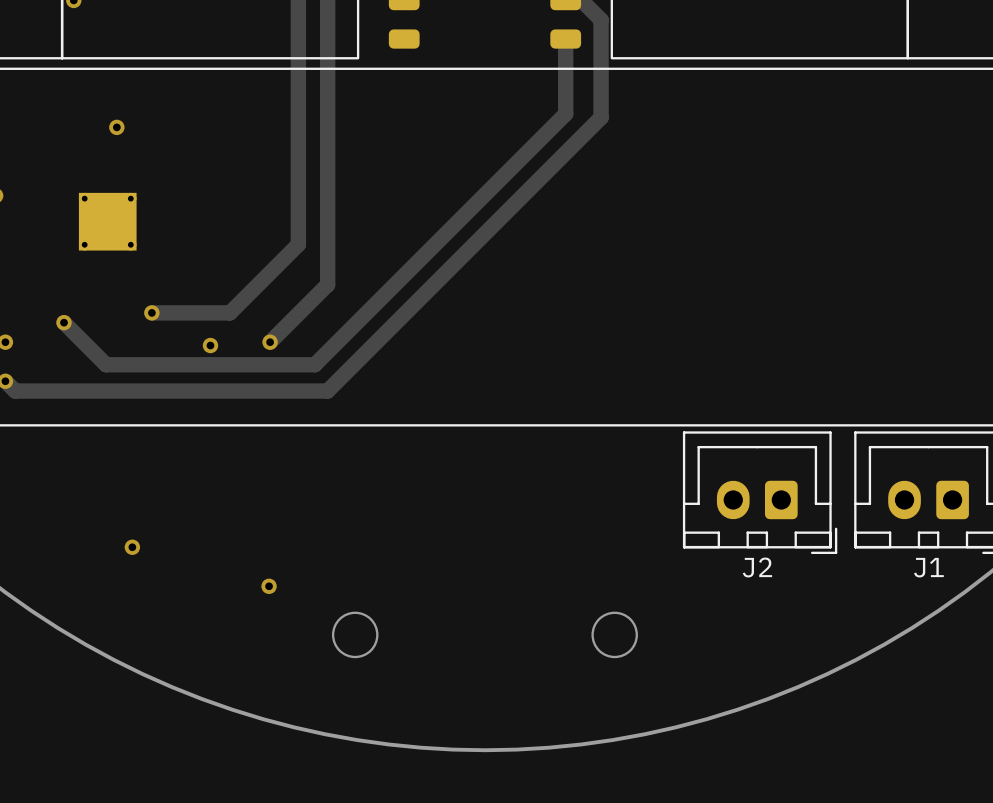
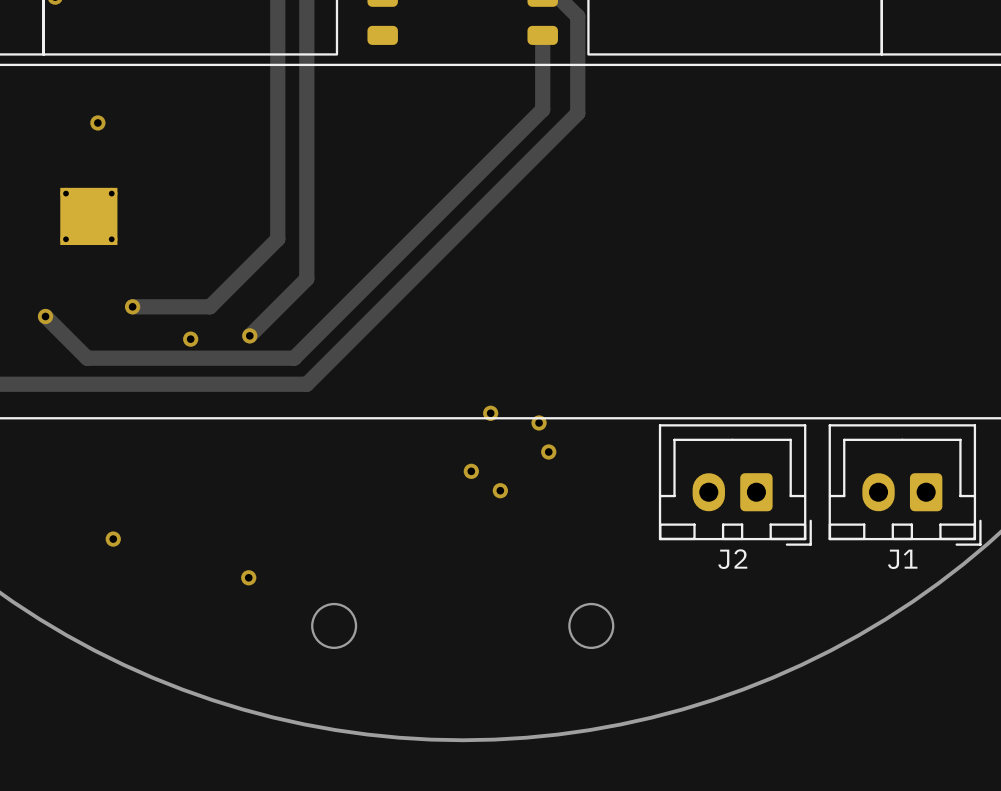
via: none -> (490, 413)
via: none -> (539, 422)
via: none -> (548, 451)
via: none -> (471, 471)
via: none -> (500, 490)

